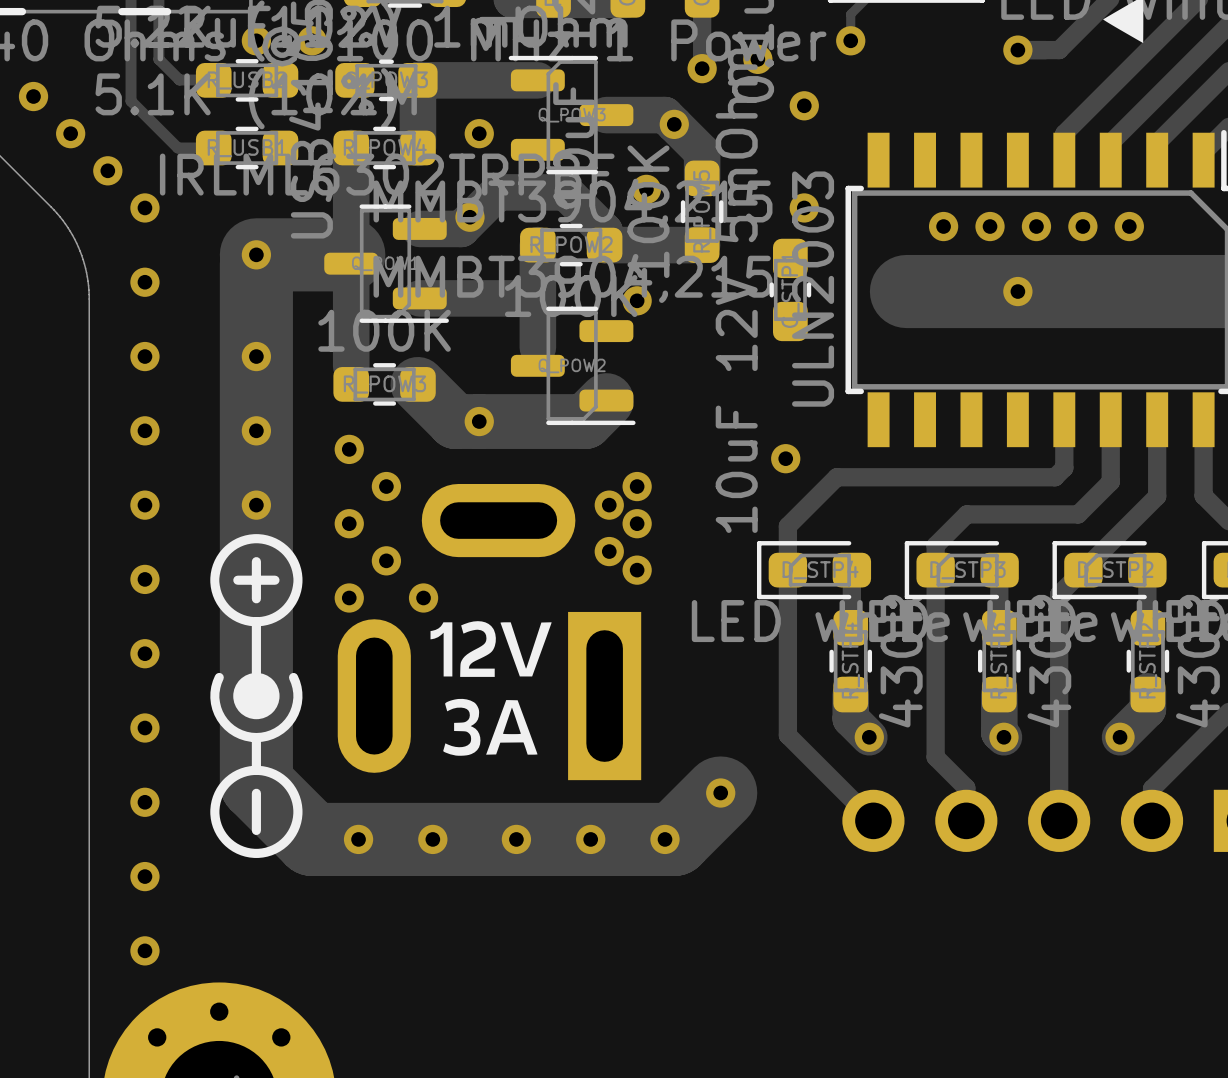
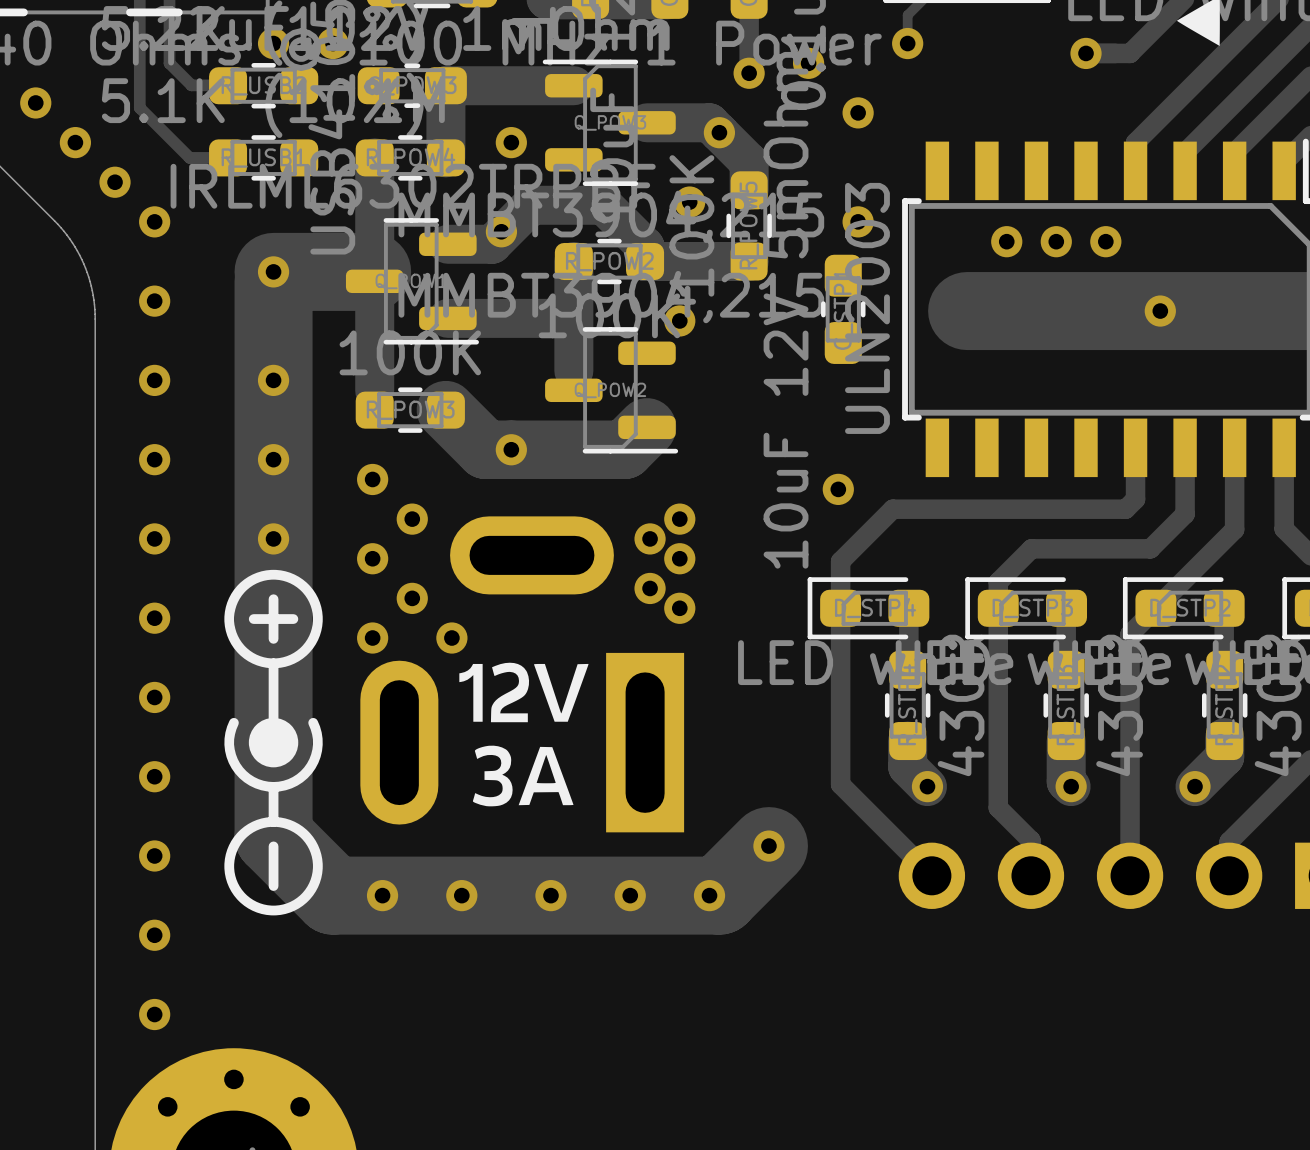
via: (1082, 226) -> none
via: (1129, 226) -> none
via: (1017, 291) -> none
via: none -> (1160, 311)

